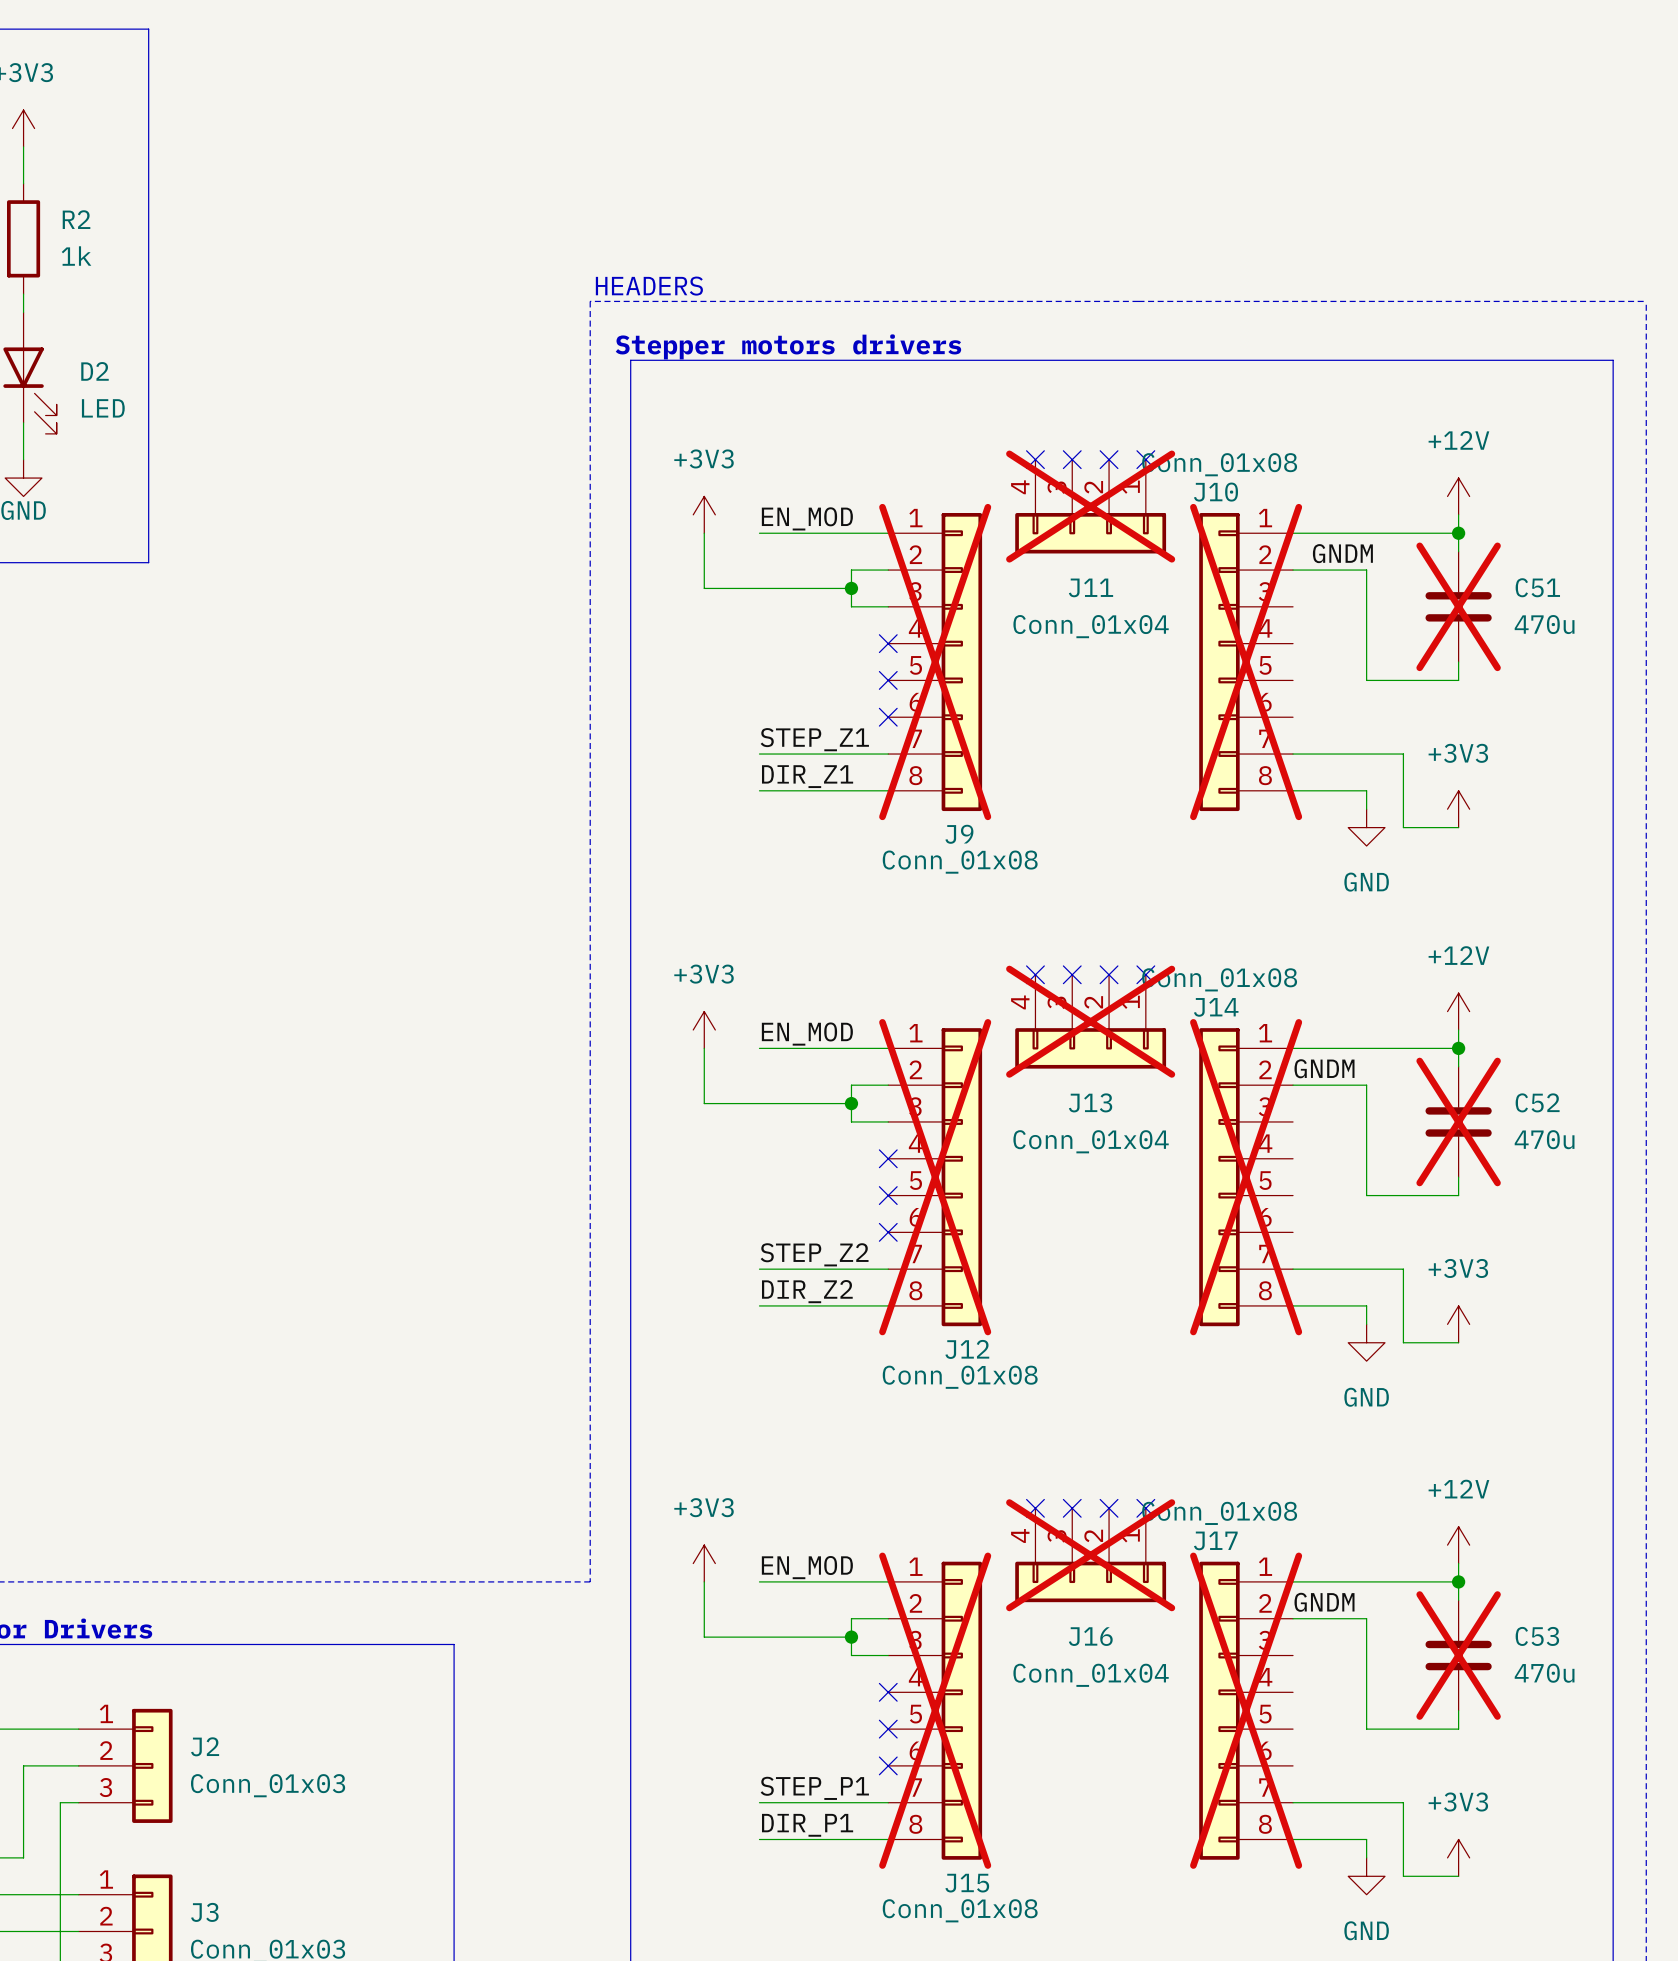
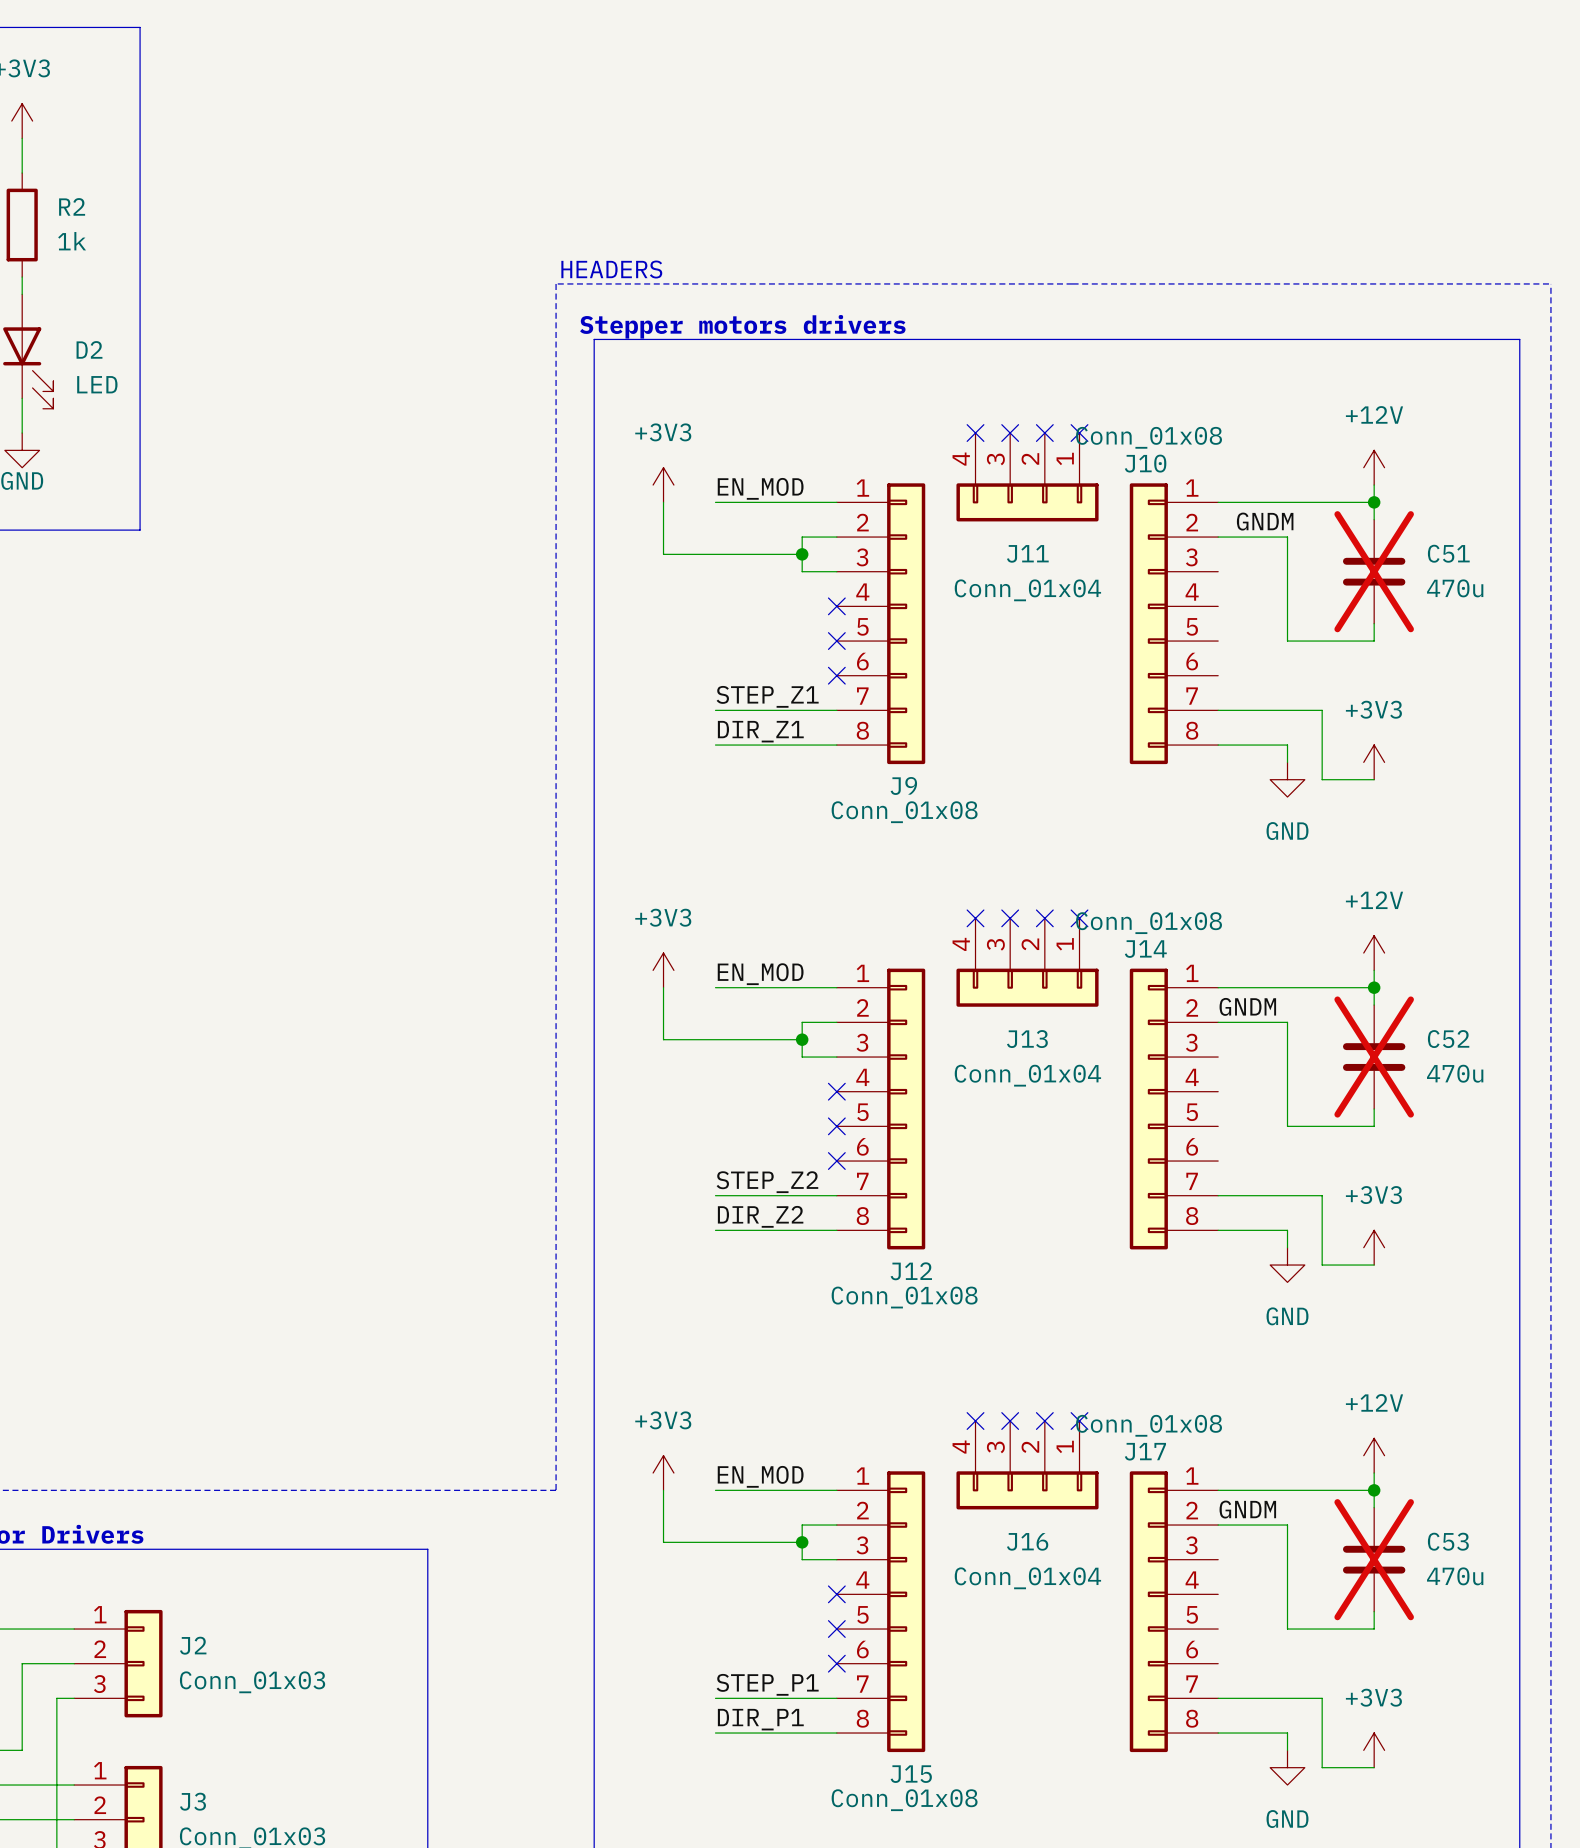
J11 do-not-place cross: (1090, 506) -> none
J9 do-not-place cross: (935, 662) -> none
J10 do-not-place cross: (1246, 662) -> none
J13 do-not-place cross: (1090, 1021) -> none
J12 do-not-place cross: (935, 1177) -> none
J14 do-not-place cross: (1246, 1177) -> none
J16 do-not-place cross: (1090, 1555) -> none
J15 do-not-place cross: (935, 1710) -> none
J17 do-not-place cross: (1246, 1710) -> none

